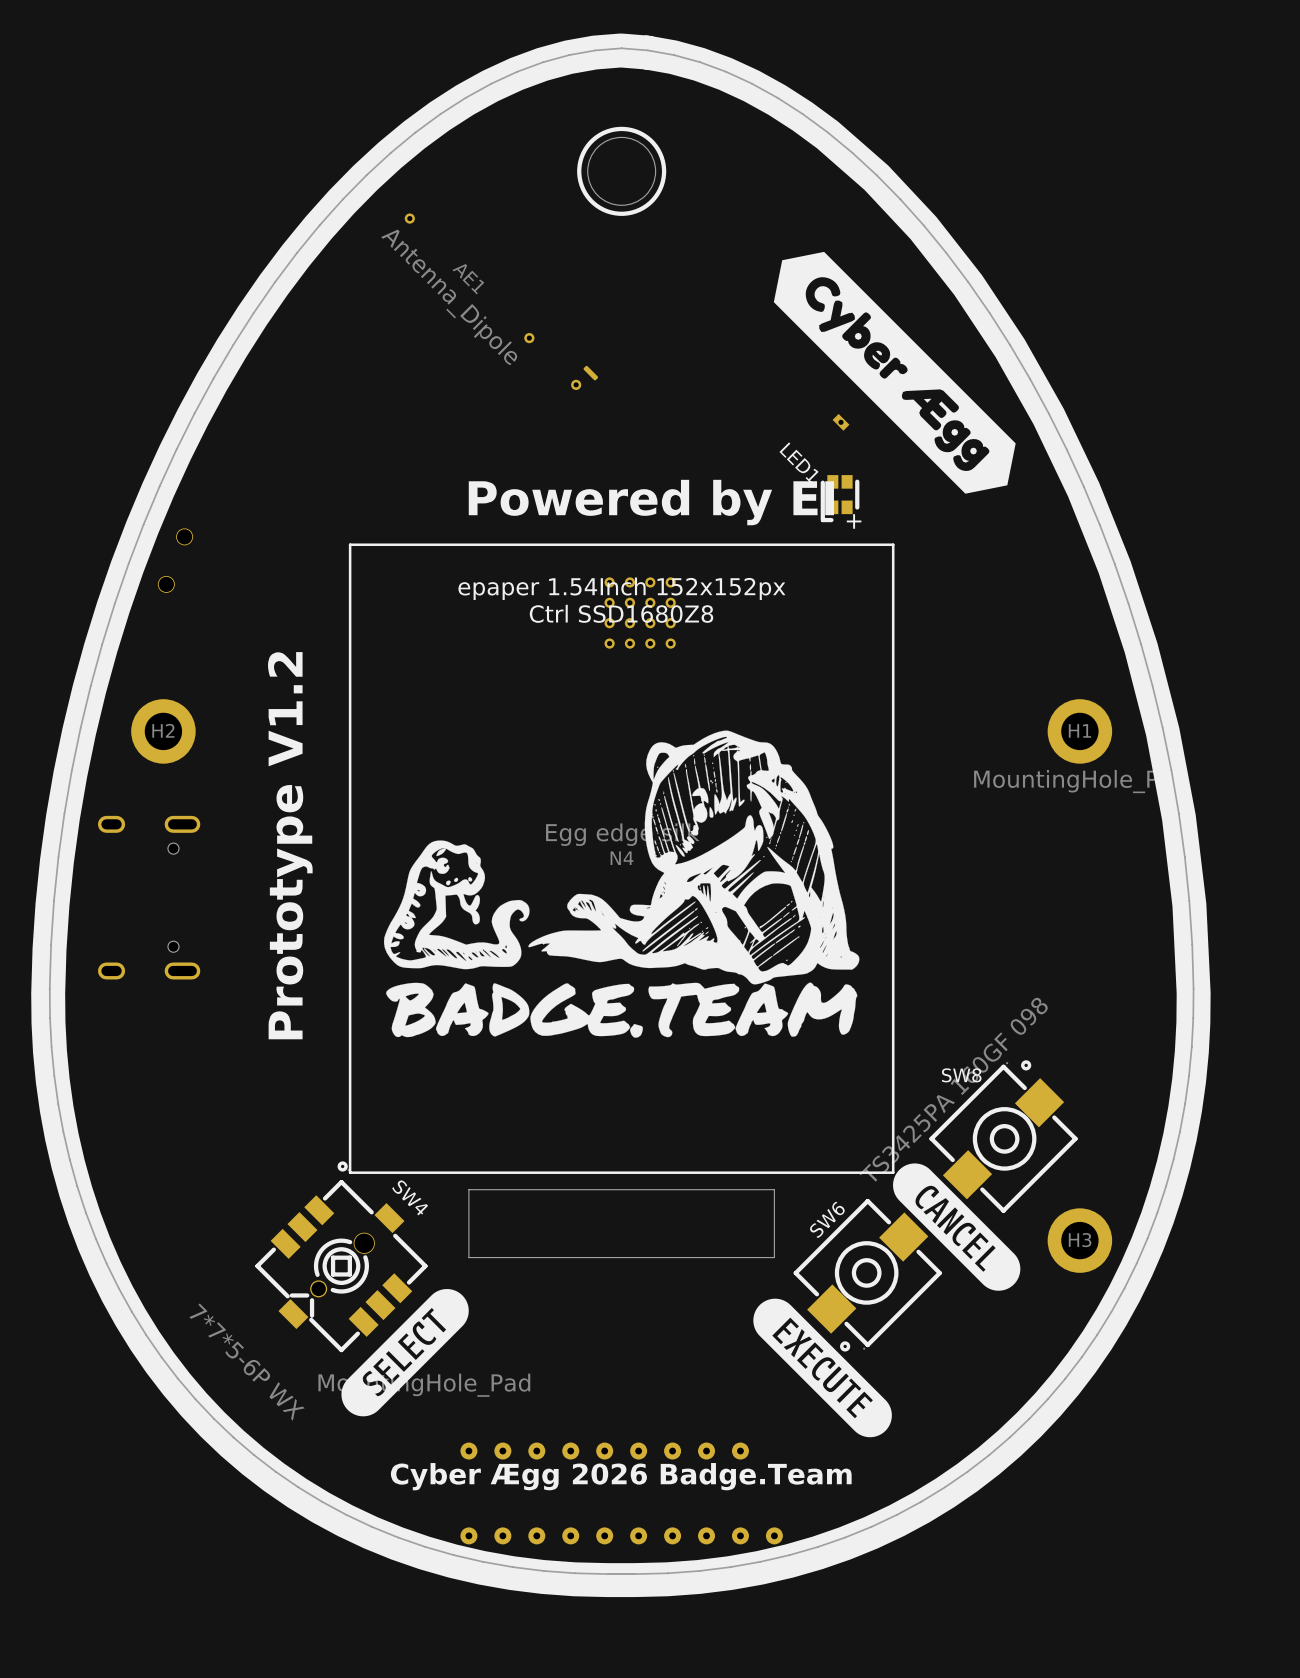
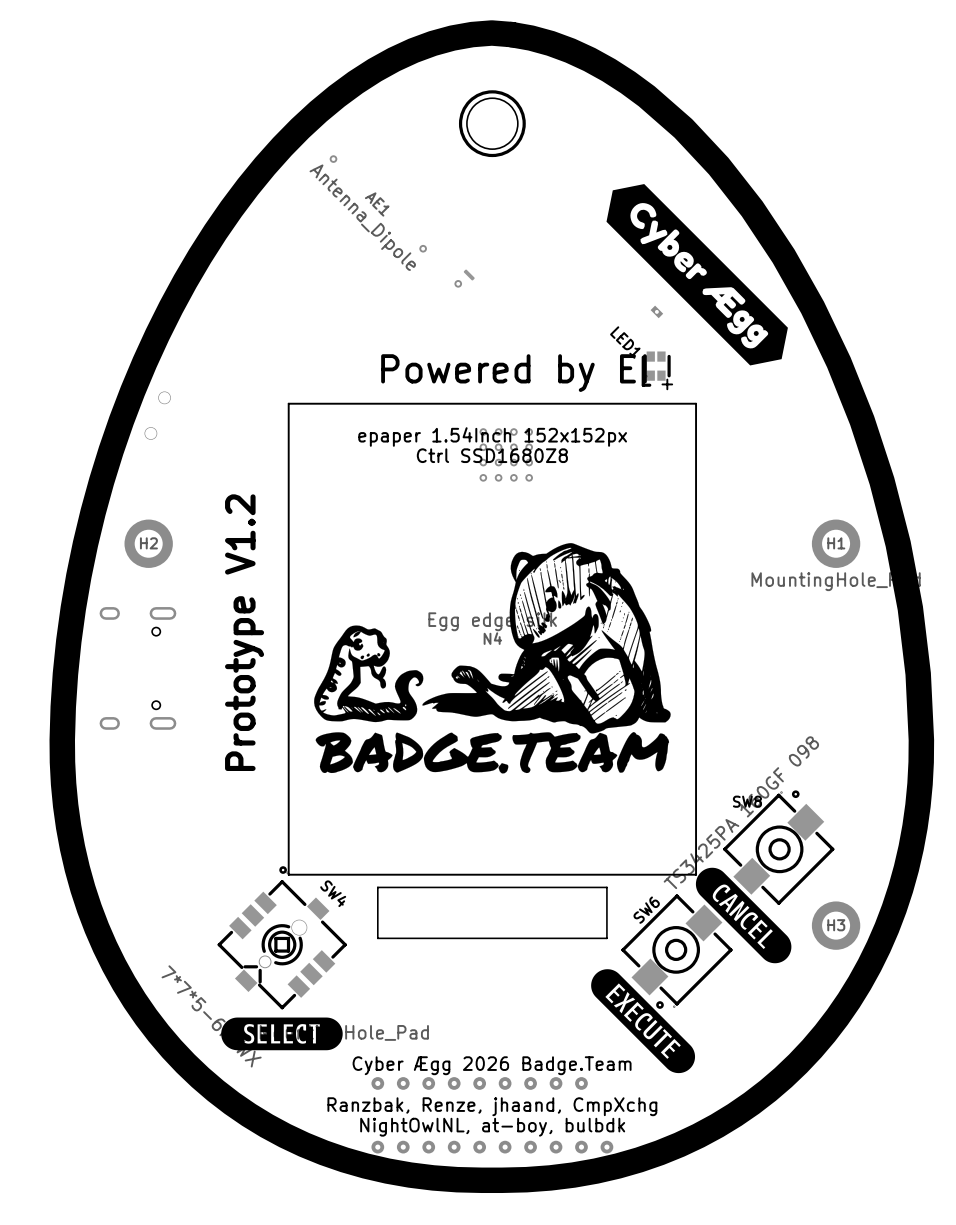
drawing: [341, 1289, 469, 1417] -> none
drawing: none -> [221, 1017, 343, 1051]
text: none -> Cyber Ægg 2026 Badge.Team (492, 1065)
text: Cyber Ægg 2026 Badge.Team (621, 1476) -> Ranzbak, Renze, jhaand, CmpXchg (492, 1106)
text: none -> NightOwlNL, at-boy, bulbdk (492, 1127)

